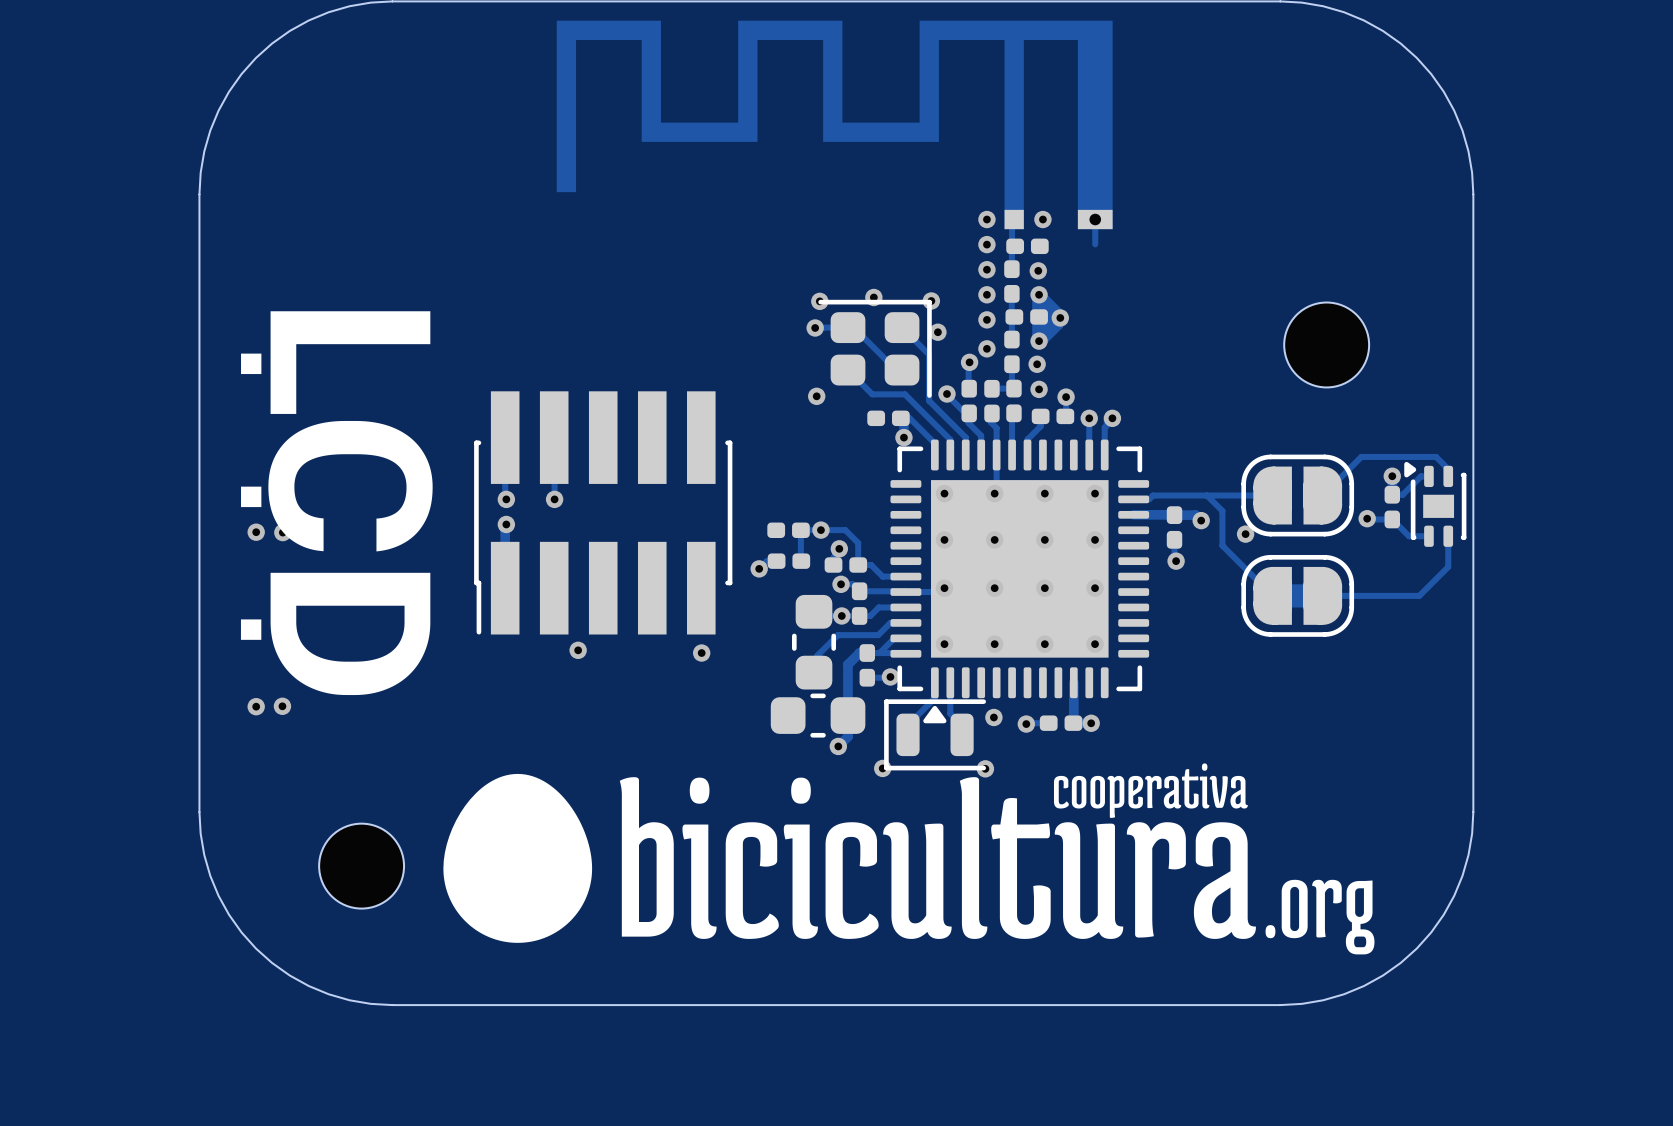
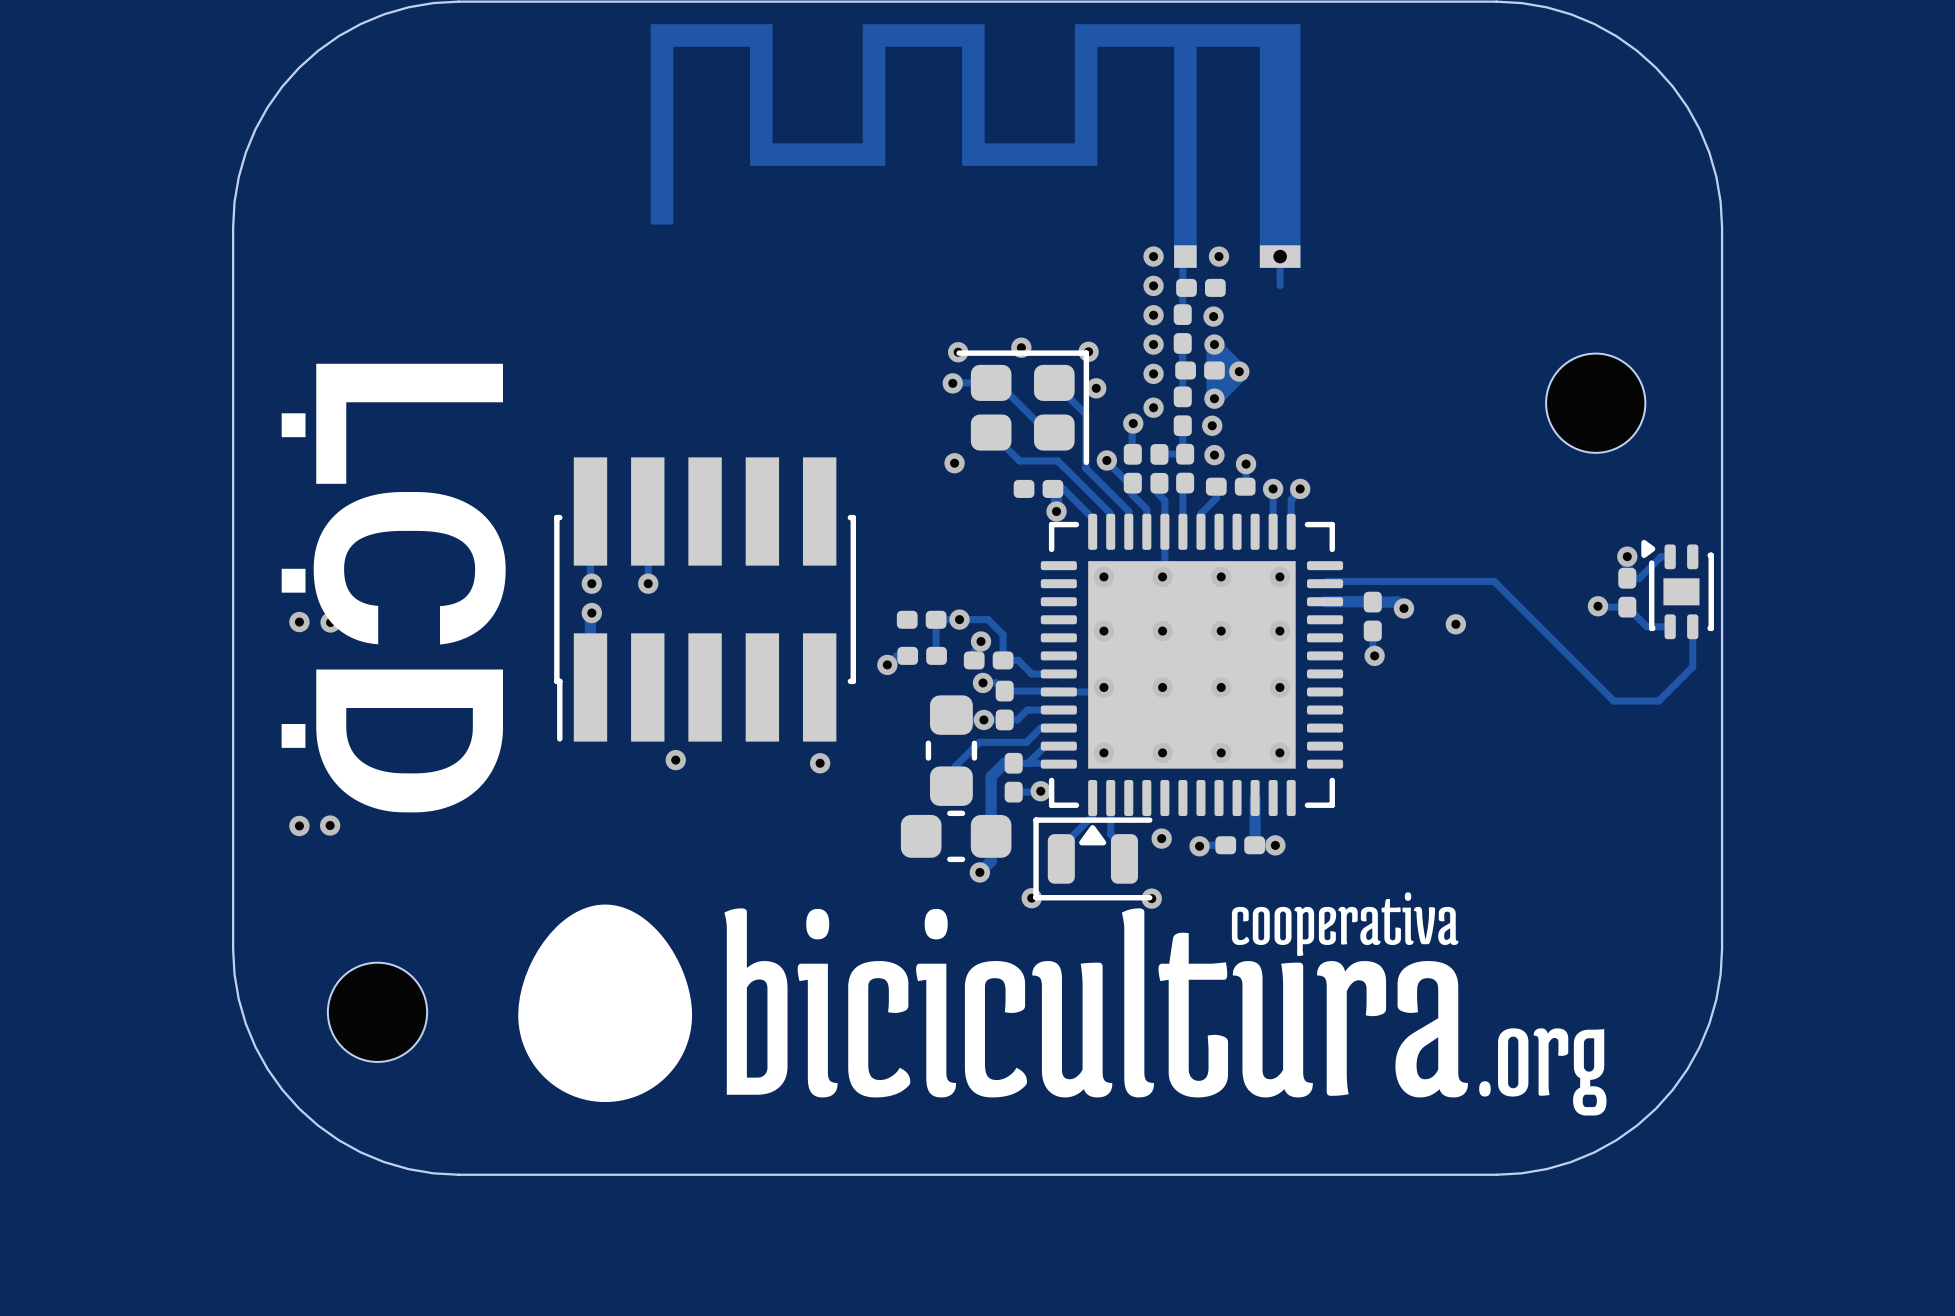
part position: (1326, 344) -> (1595, 403)
track: (1448, 476) (1448, 469) (1436, 456) (1361, 456) (1322, 495) -> none
track: (1206, 495) (1222, 510) (1222, 545) (1272, 595) -> none
track: (1272, 495) (1152, 495) (1149, 499) (1133, 499) -> (1692, 662) (1692, 667) (1658, 701) (1613, 701) (1494, 581) (1327, 581) (1325, 583)
part: (1297, 495) -> none
track: (1448, 566) (1419, 595) (1322, 595) -> none
part: (1297, 595) -> none
part position: (361, 866) -> (377, 1012)

